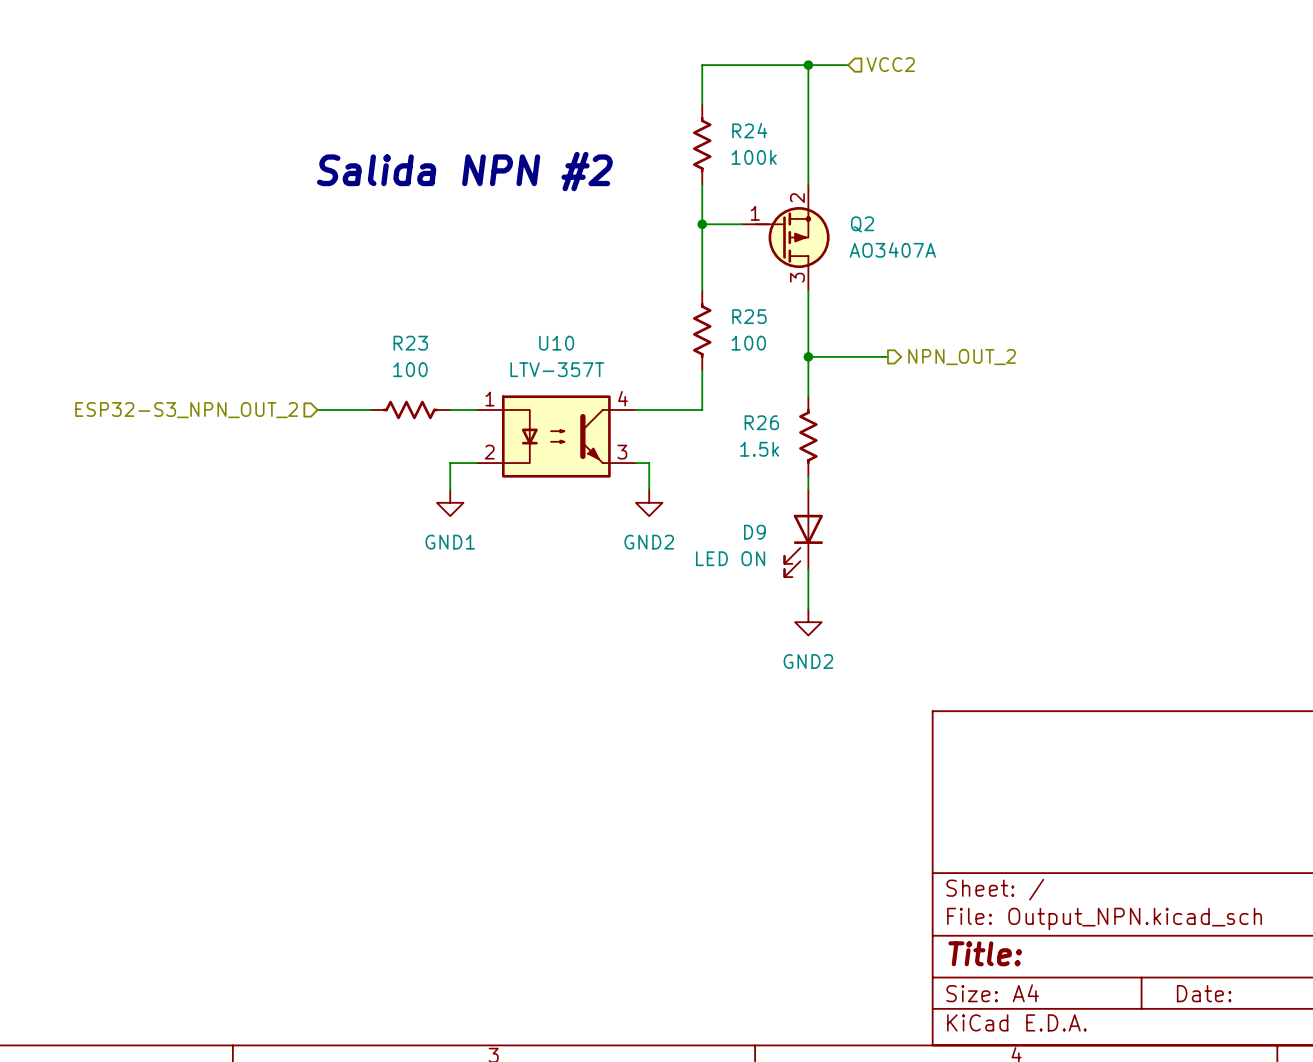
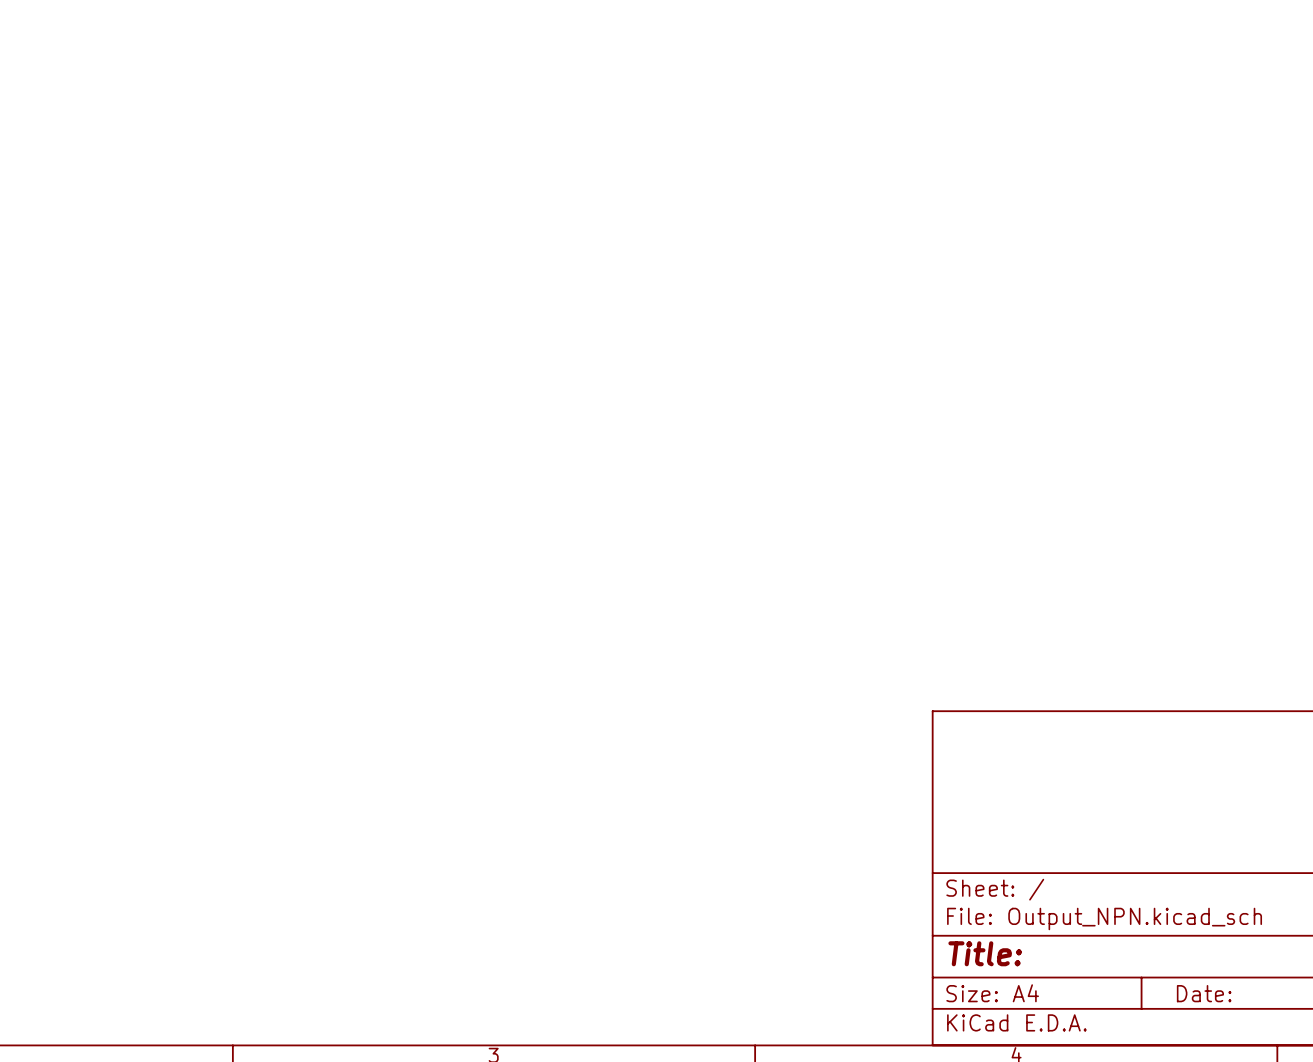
hierarchical label: VCC2 (890, 64) -> none
wire: (808, 65) (808, 184) -> none
junction: (808, 65) -> none
wire: (848, 65) (702, 65) (702, 104) -> none
R24: 100k (702, 144) -> none
text: Salida NPN #2 (464, 171) -> none
wire: (702, 184) (702, 290) -> none
wire: (702, 224) (742, 224) -> none
junction: (702, 224) -> none
Q2: AO3407A (785, 237) -> none
wire: (808, 290) (808, 396) -> none
R25: 100 (702, 330) -> none
wire: (808, 356) (887, 356) -> none
junction: (808, 356) -> none
hierarchical label: NPN_OUT_2 (962, 357) -> none
wire: (702, 370) (702, 409) (635, 409) -> none
wire: (317, 409) (370, 409) -> none
R23: 100 (410, 409) -> none
wire: (450, 409) (476, 409) -> none
hierarchical label: ESP32-S3_NPN_OUT_2 (186, 410) -> none
U10: LTV-357T (556, 436) -> none
R26: 1.5k (808, 436) -> none
wire: (476, 463) (450, 463) (450, 489) -> none
wire: (635, 463) (649, 463) (649, 489) -> none
wire: (808, 476) (808, 489) -> none
power symbol: GND1 (450, 502) -> none
power symbol: GND2 (649, 502) -> none
D9: LED ON (803, 533) -> none
wire: (808, 569) (808, 608) -> none
power symbol: GND2 (808, 622) -> none

